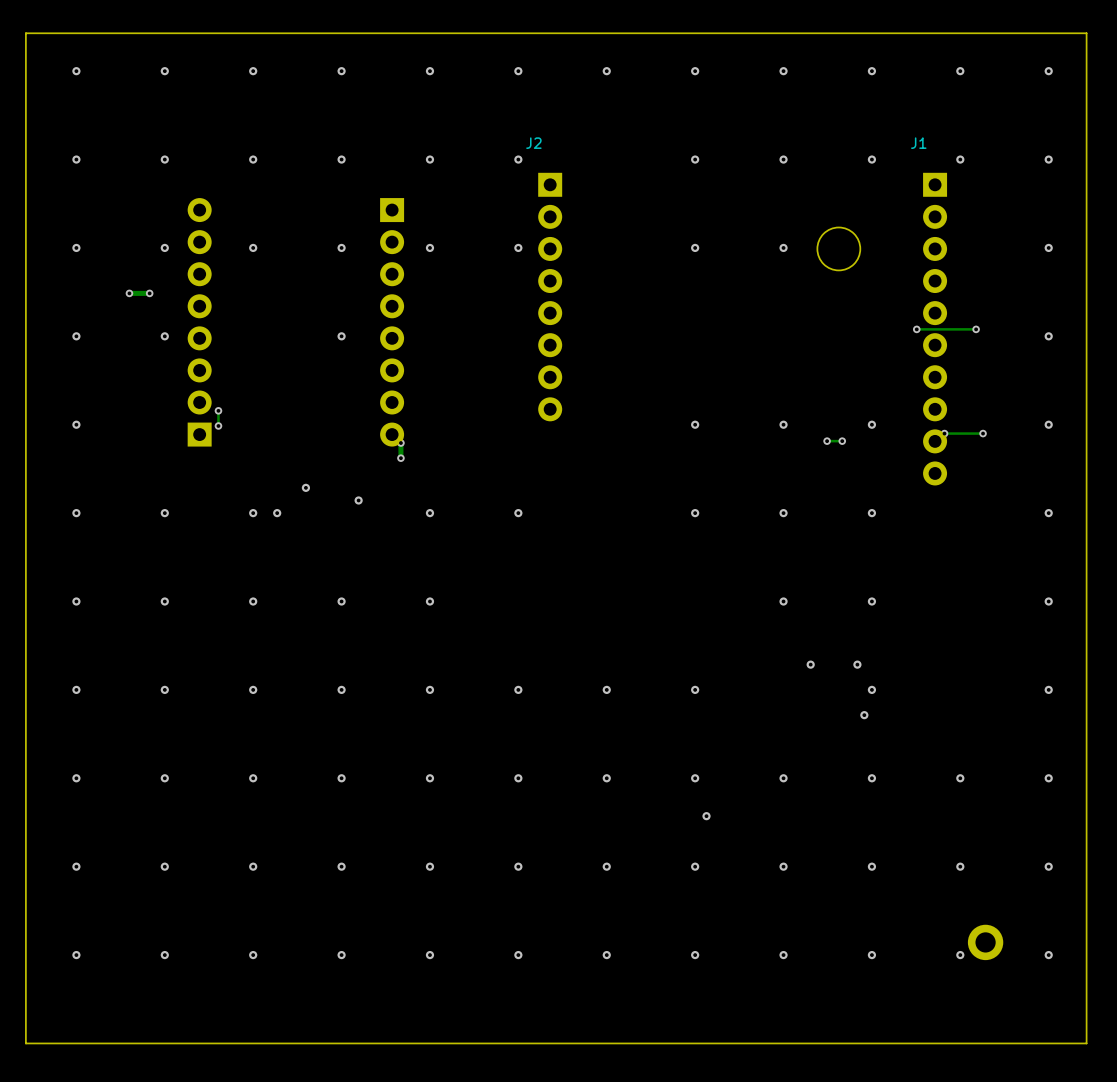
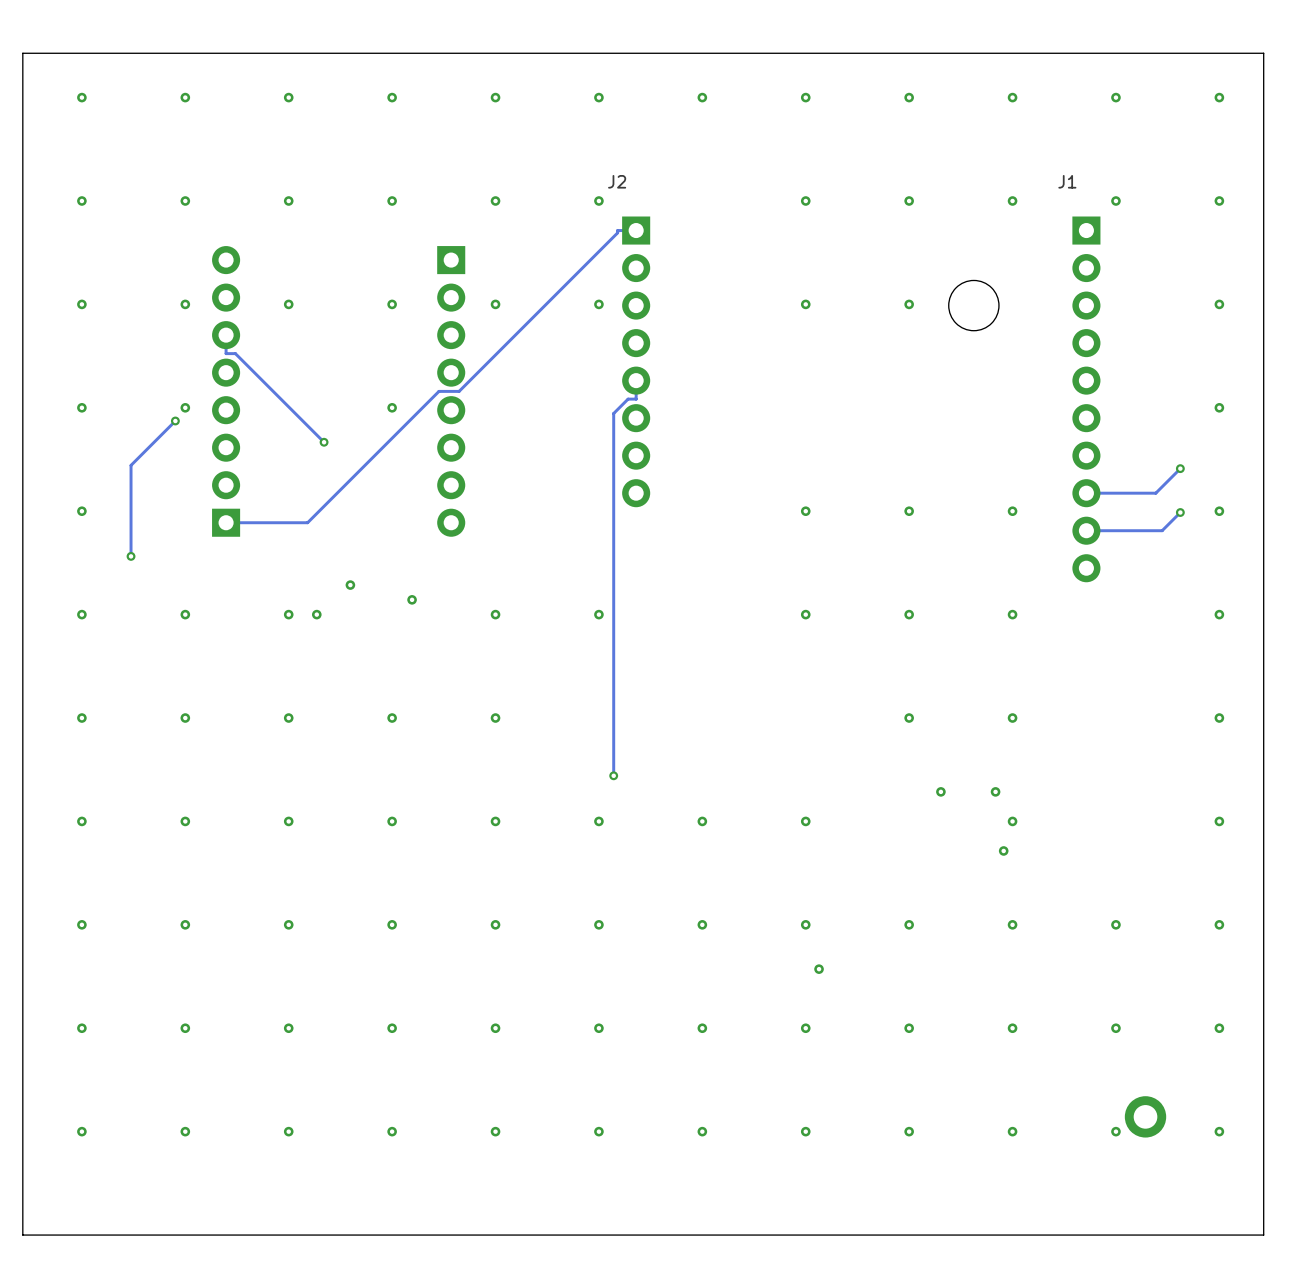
track: none -> (636, 230) (617, 230) (617, 232) (459, 391) (438, 391) (307, 522) (226, 522)
track: none -> (226, 335) (226, 353) (235, 353) (324, 442)
via: (129, 293) -> none
track: (149, 293) (129, 293) -> none
via: (149, 293) -> none
track: none -> (636, 380) (636, 399) (628, 399) (613, 413) (613, 775)
via: (916, 329) -> none
track: (976, 329) (916, 329) -> none
via: (976, 329) -> none
track: none -> (175, 421) (131, 465) (131, 556)
via: none -> (175, 421)
via: none -> (324, 442)
track: none -> (1180, 468) (1155, 493) (1086, 493)
via: none -> (1180, 468)
track: (218, 410) (218, 425) -> none
via: (218, 410) -> none
via: (218, 425) -> none
track: none -> (1180, 512) (1162, 530) (1086, 530)
via: none -> (1180, 512)
via: (944, 433) -> none
track: (983, 433) (944, 433) -> none
via: (983, 433) -> none
via: (827, 441) -> none
track: (842, 441) (827, 441) -> none
via: (842, 441) -> none
track: (400, 443) (400, 458) -> none
via: (400, 443) -> none
via: (400, 458) -> none
via: none -> (131, 556)
via: none -> (613, 775)

